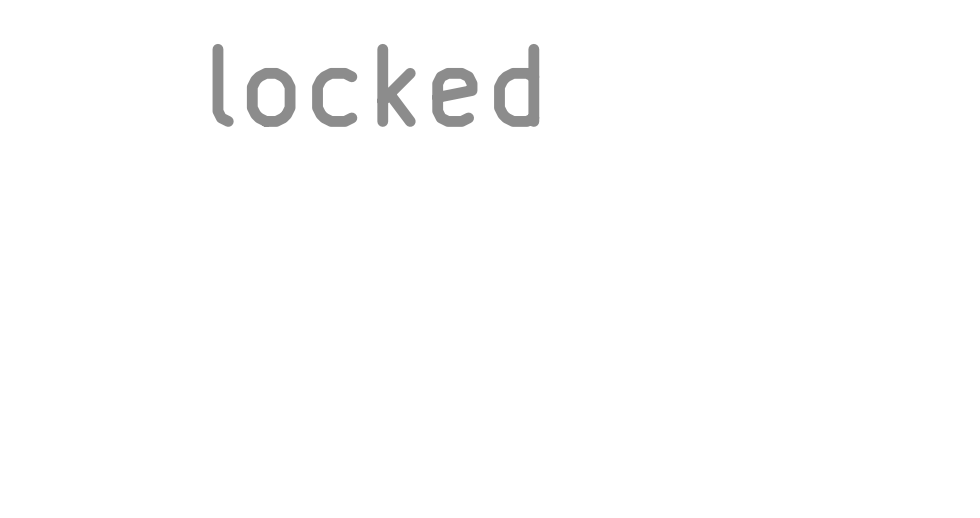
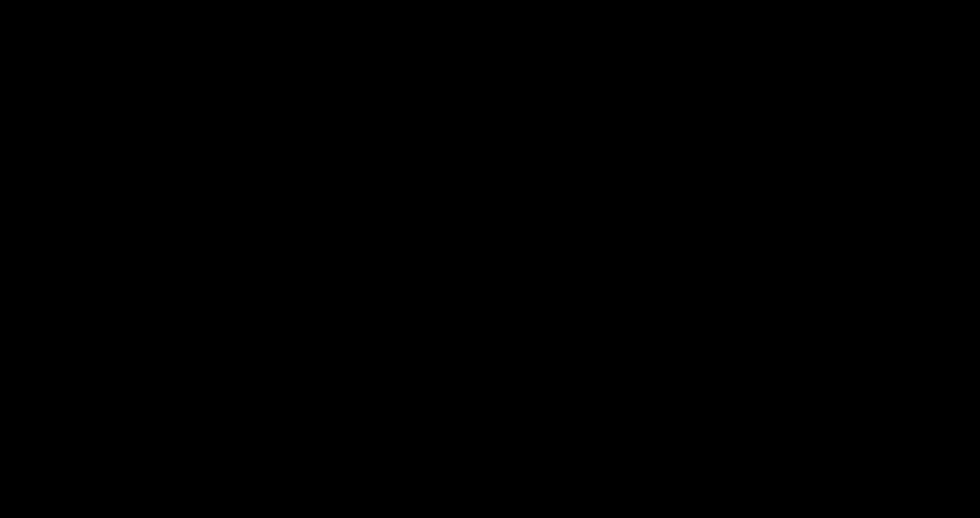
text: locked (375, 85) -> none

